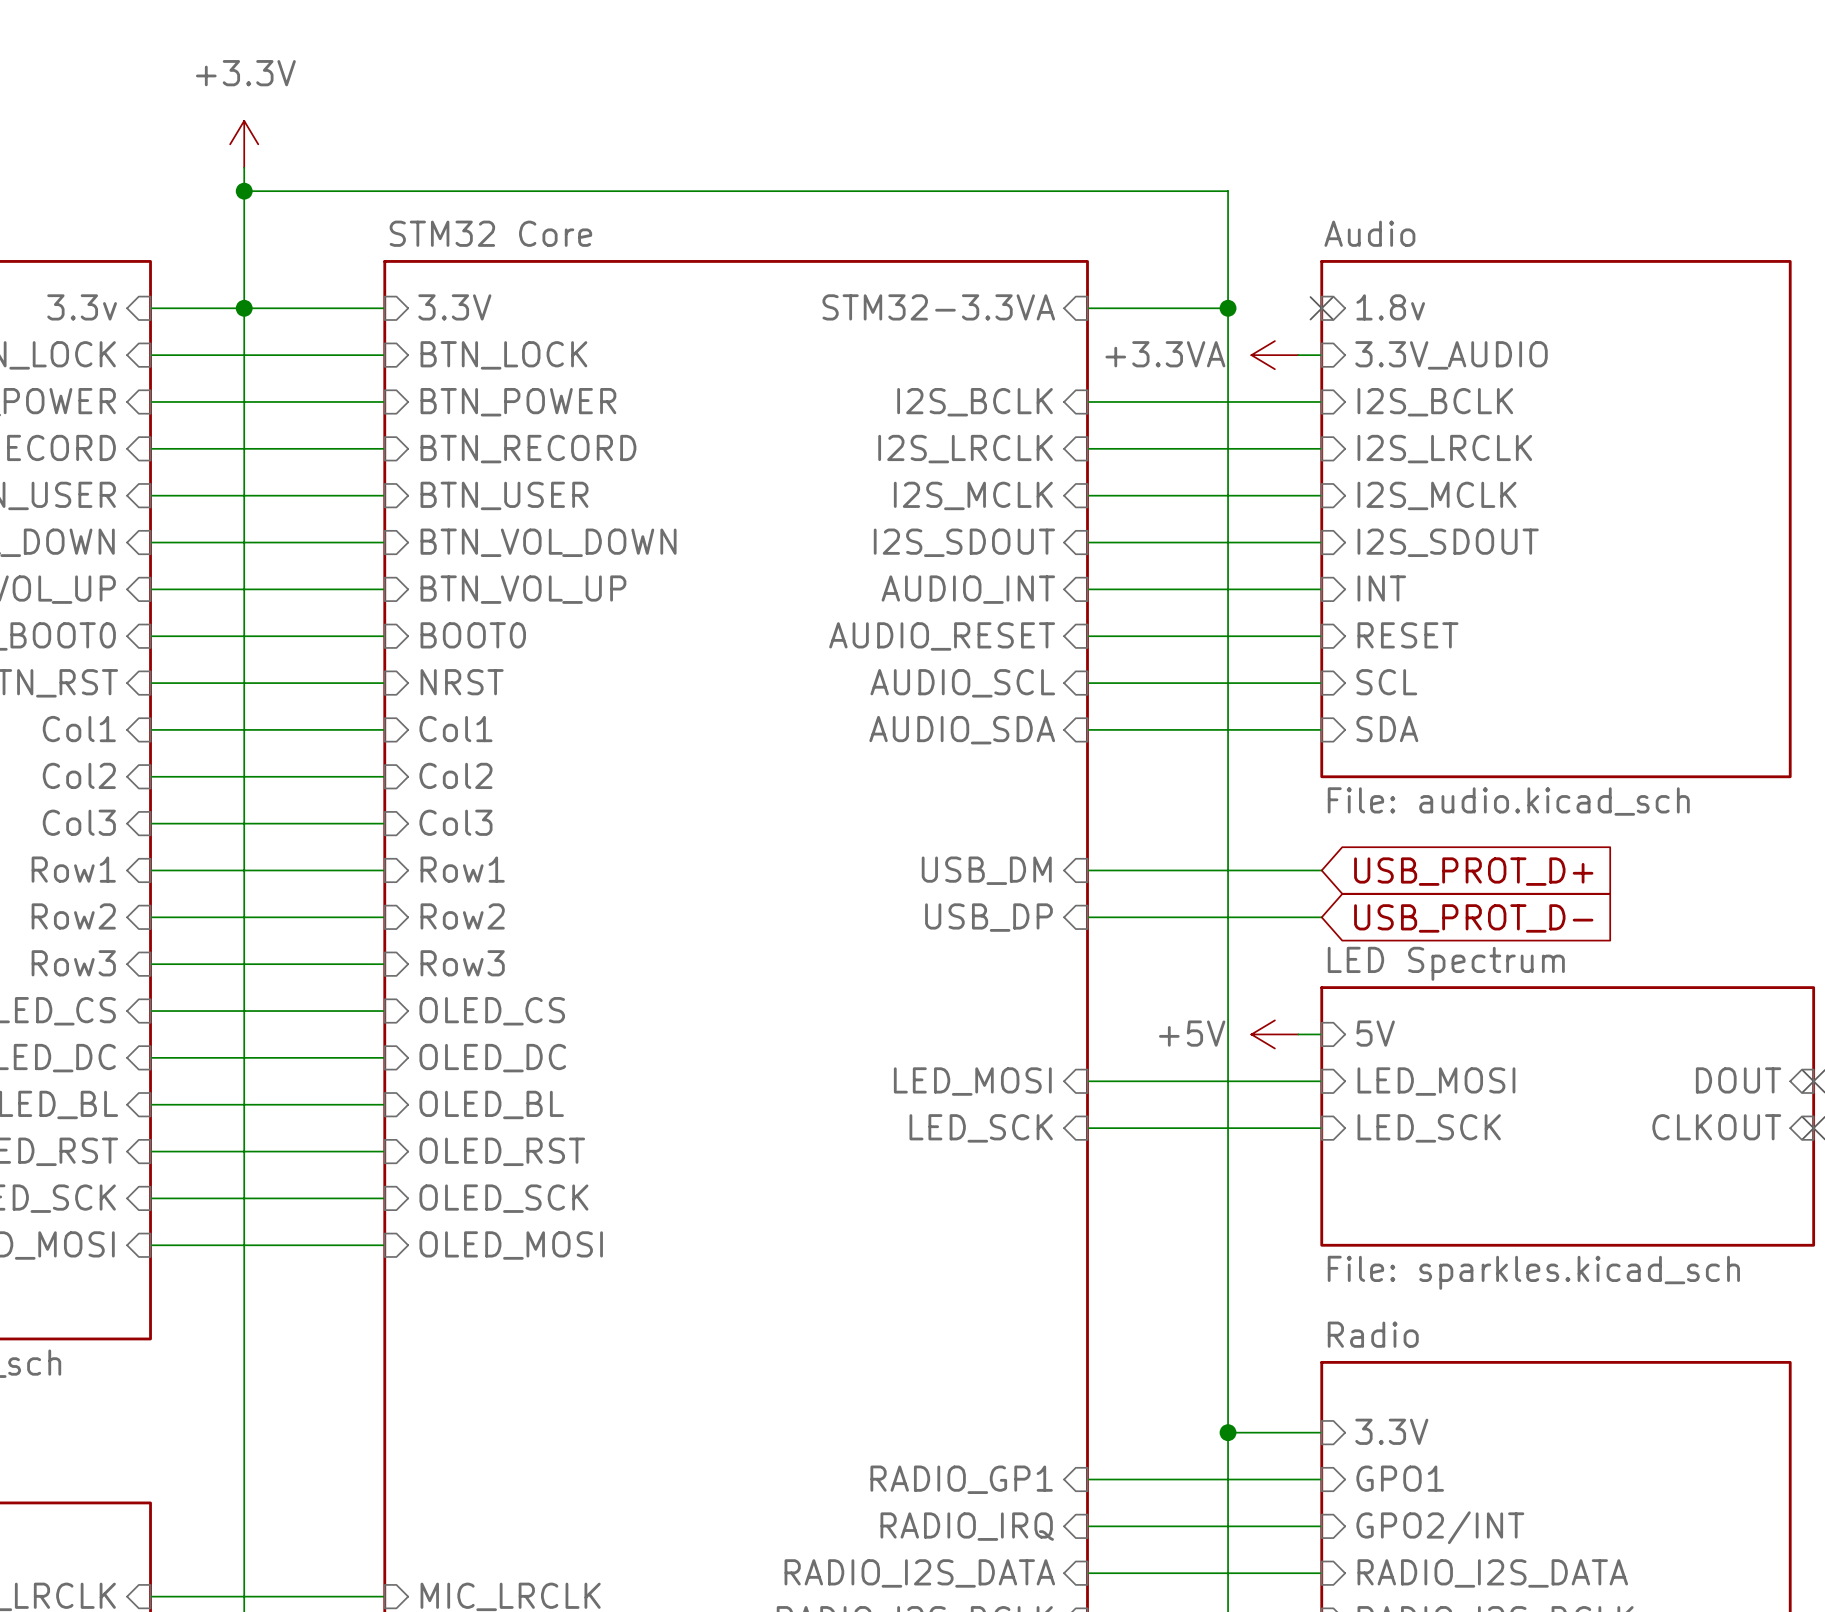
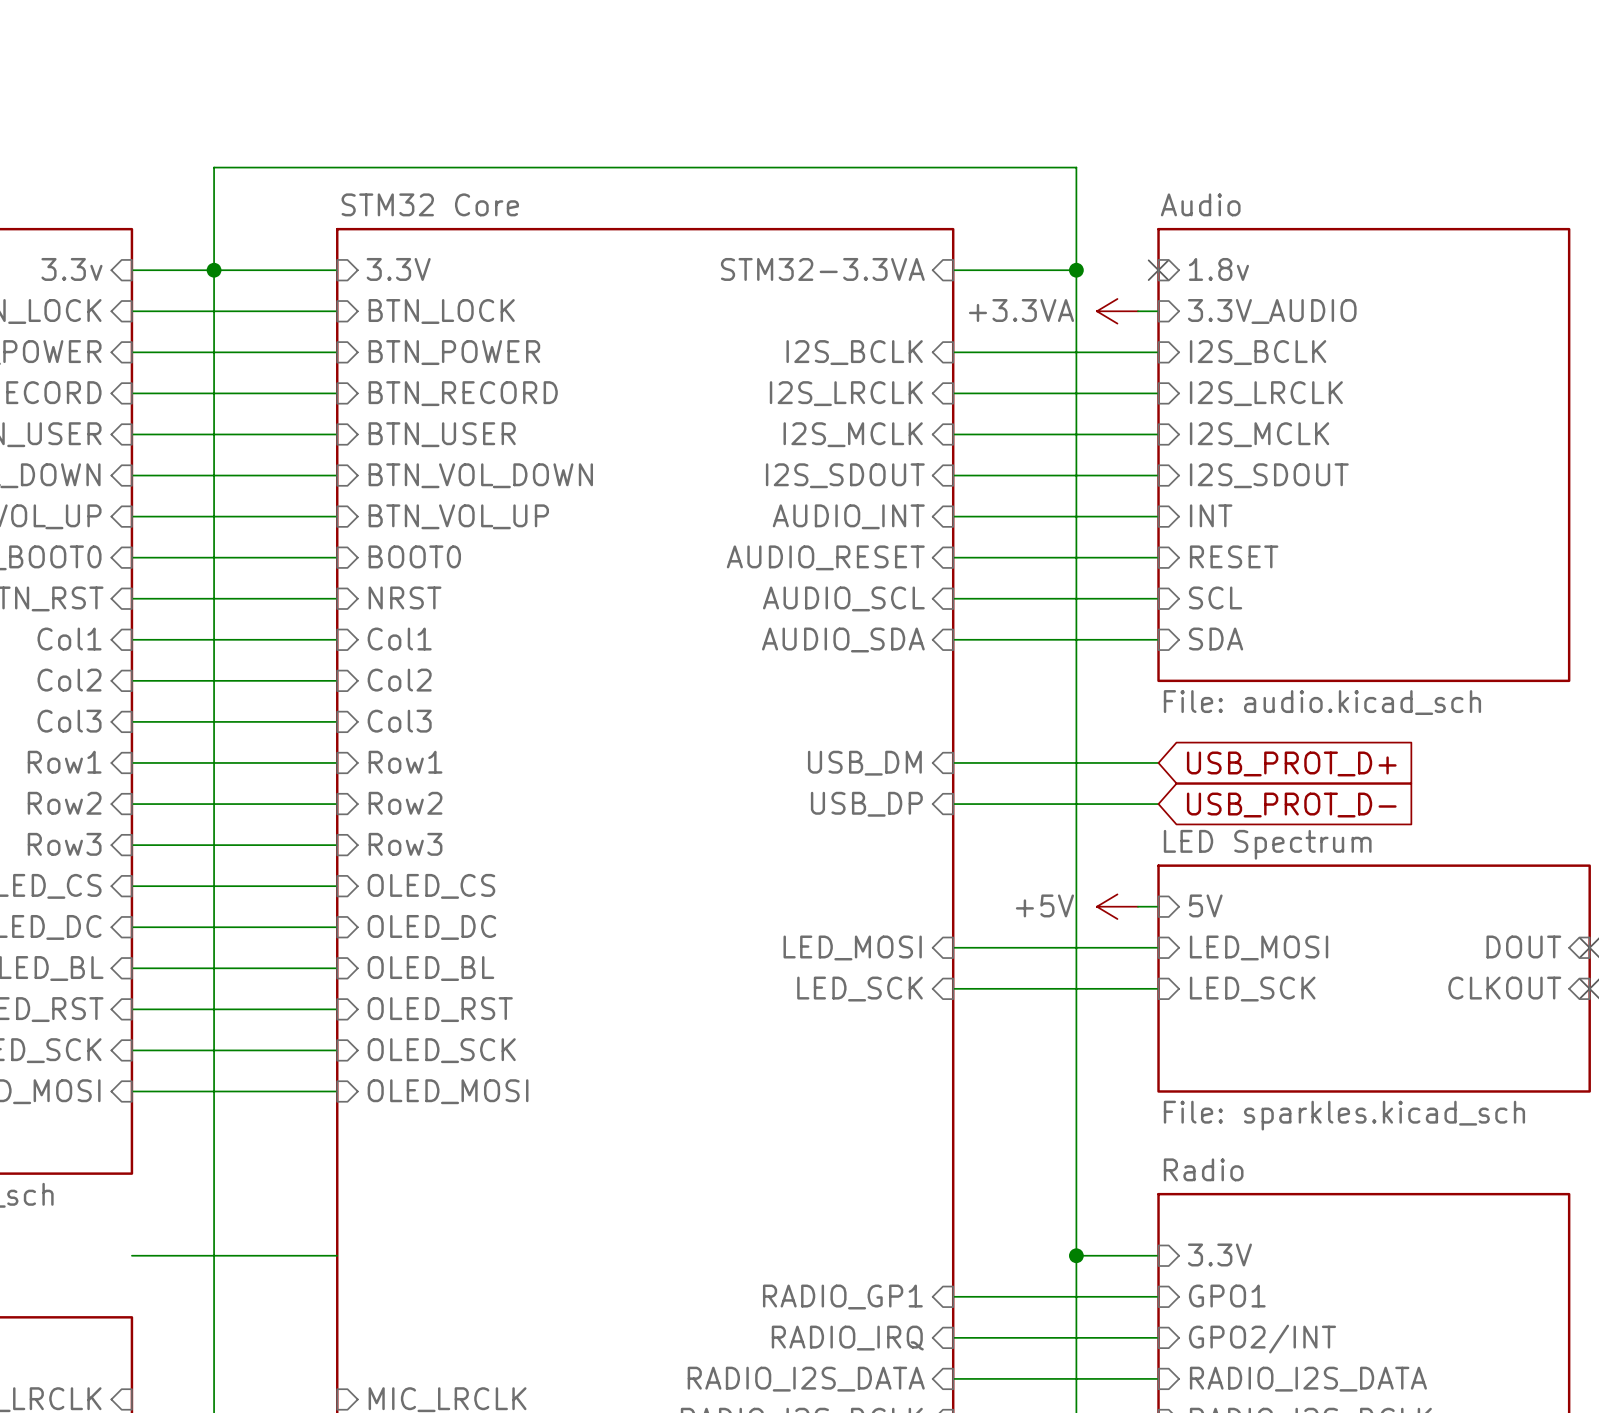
power symbol: +3.3V (244, 144) -> none
wire: (244, 167) (244, 191) -> none
junction: (244, 191) -> none
wire: (150, 1596) (384, 1596) -> (131, 1255) (337, 1255)

